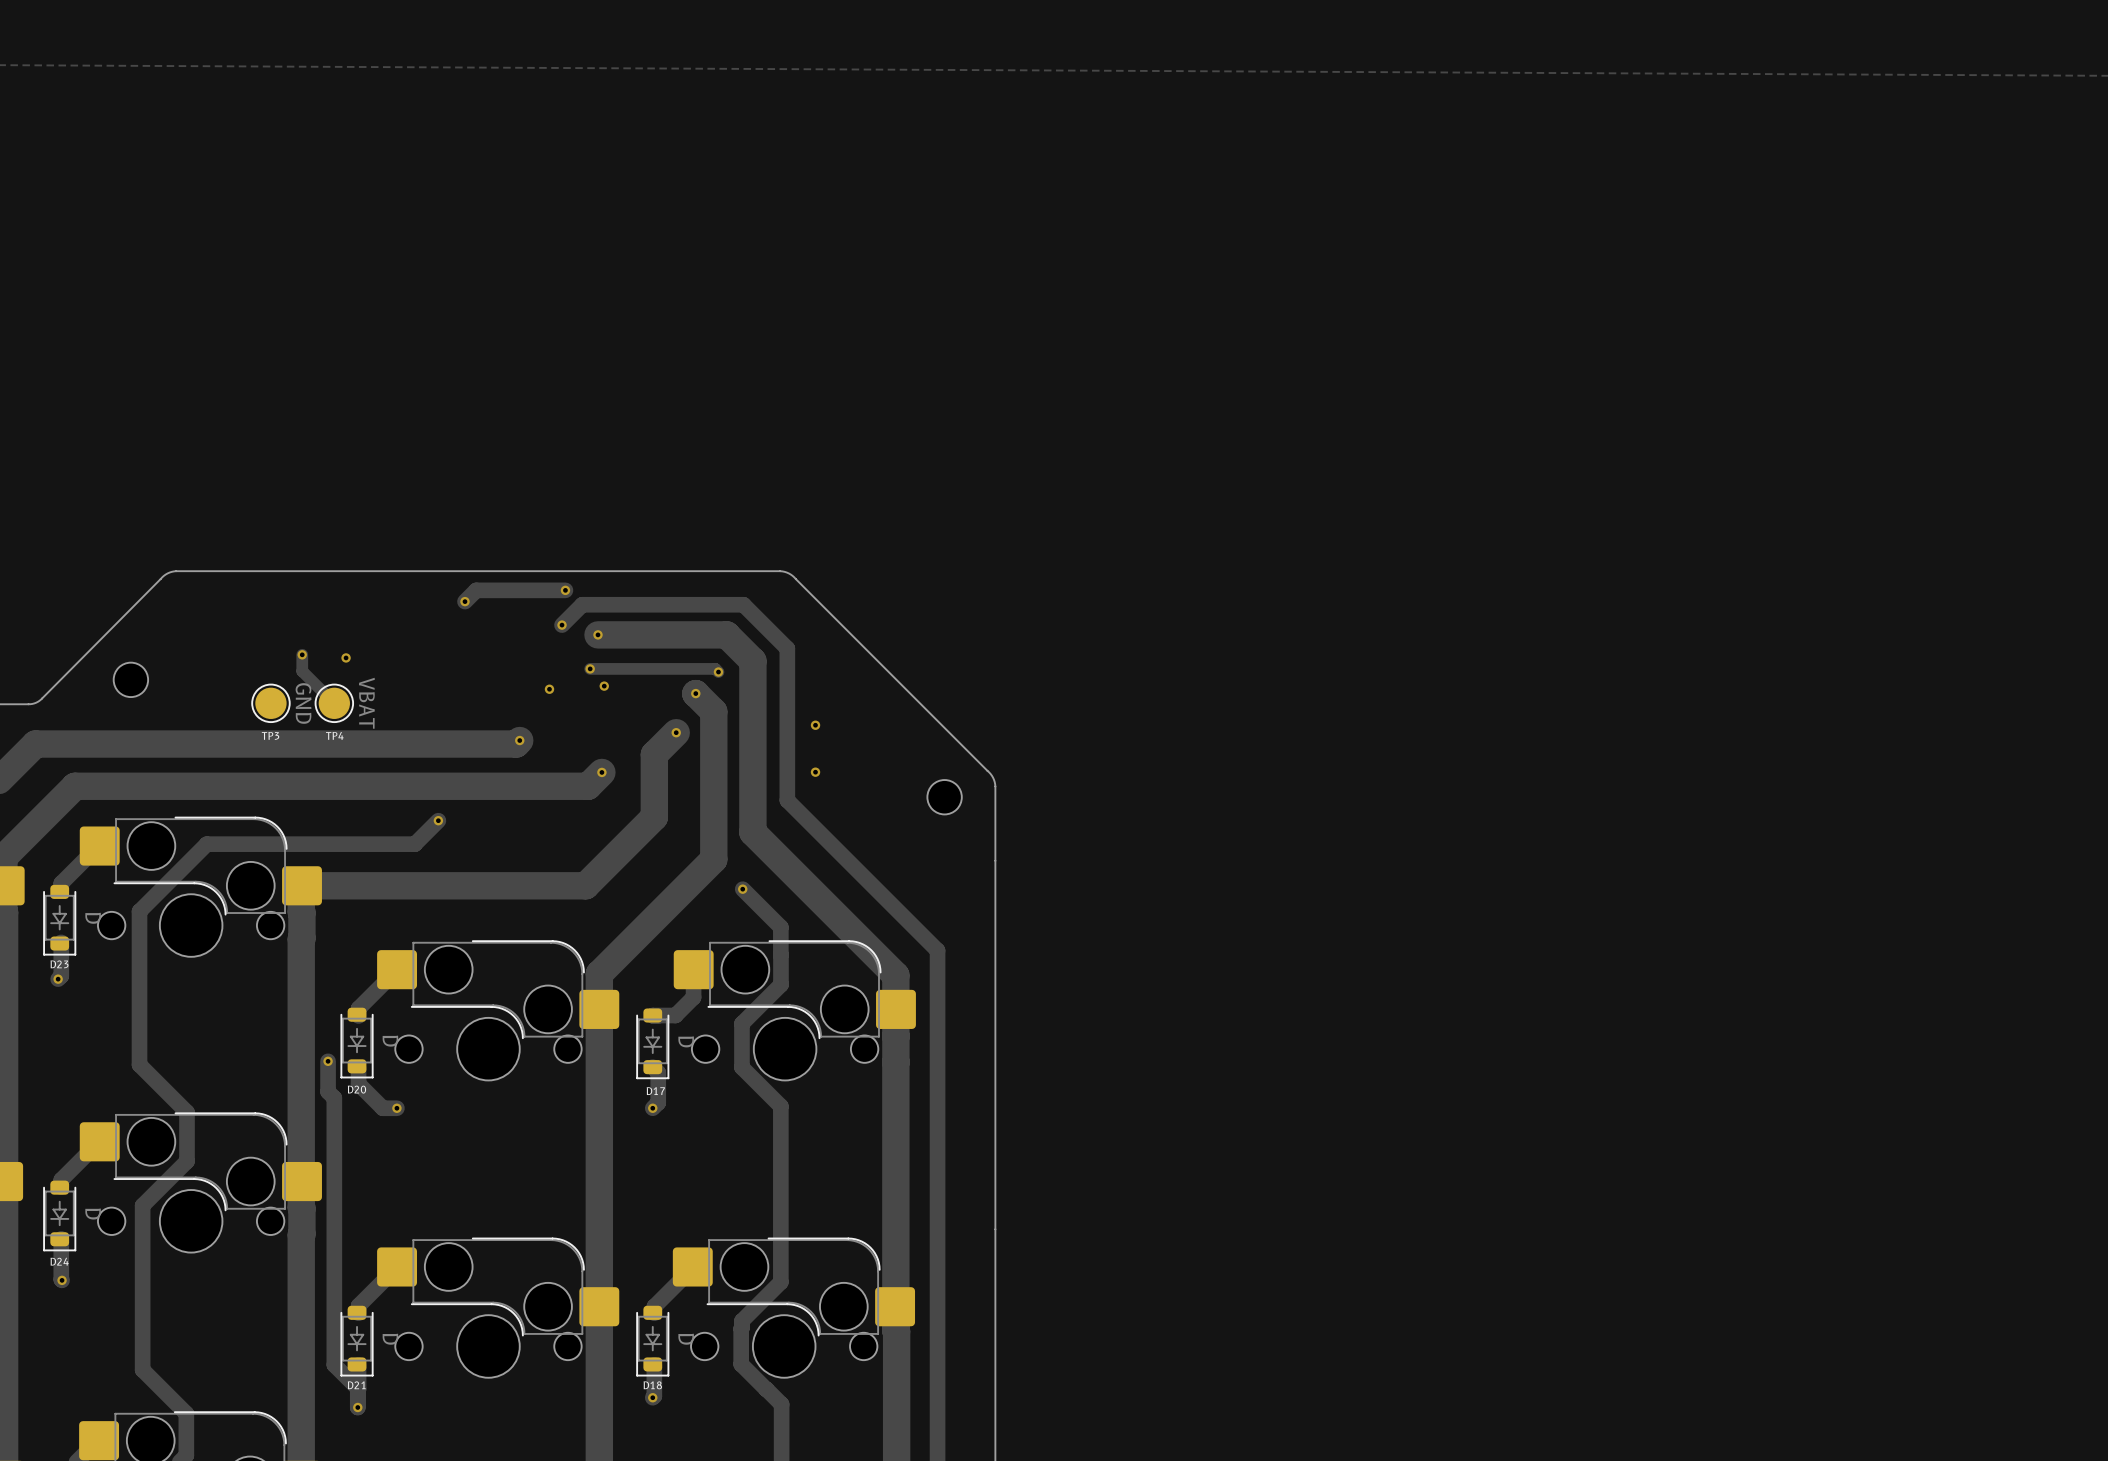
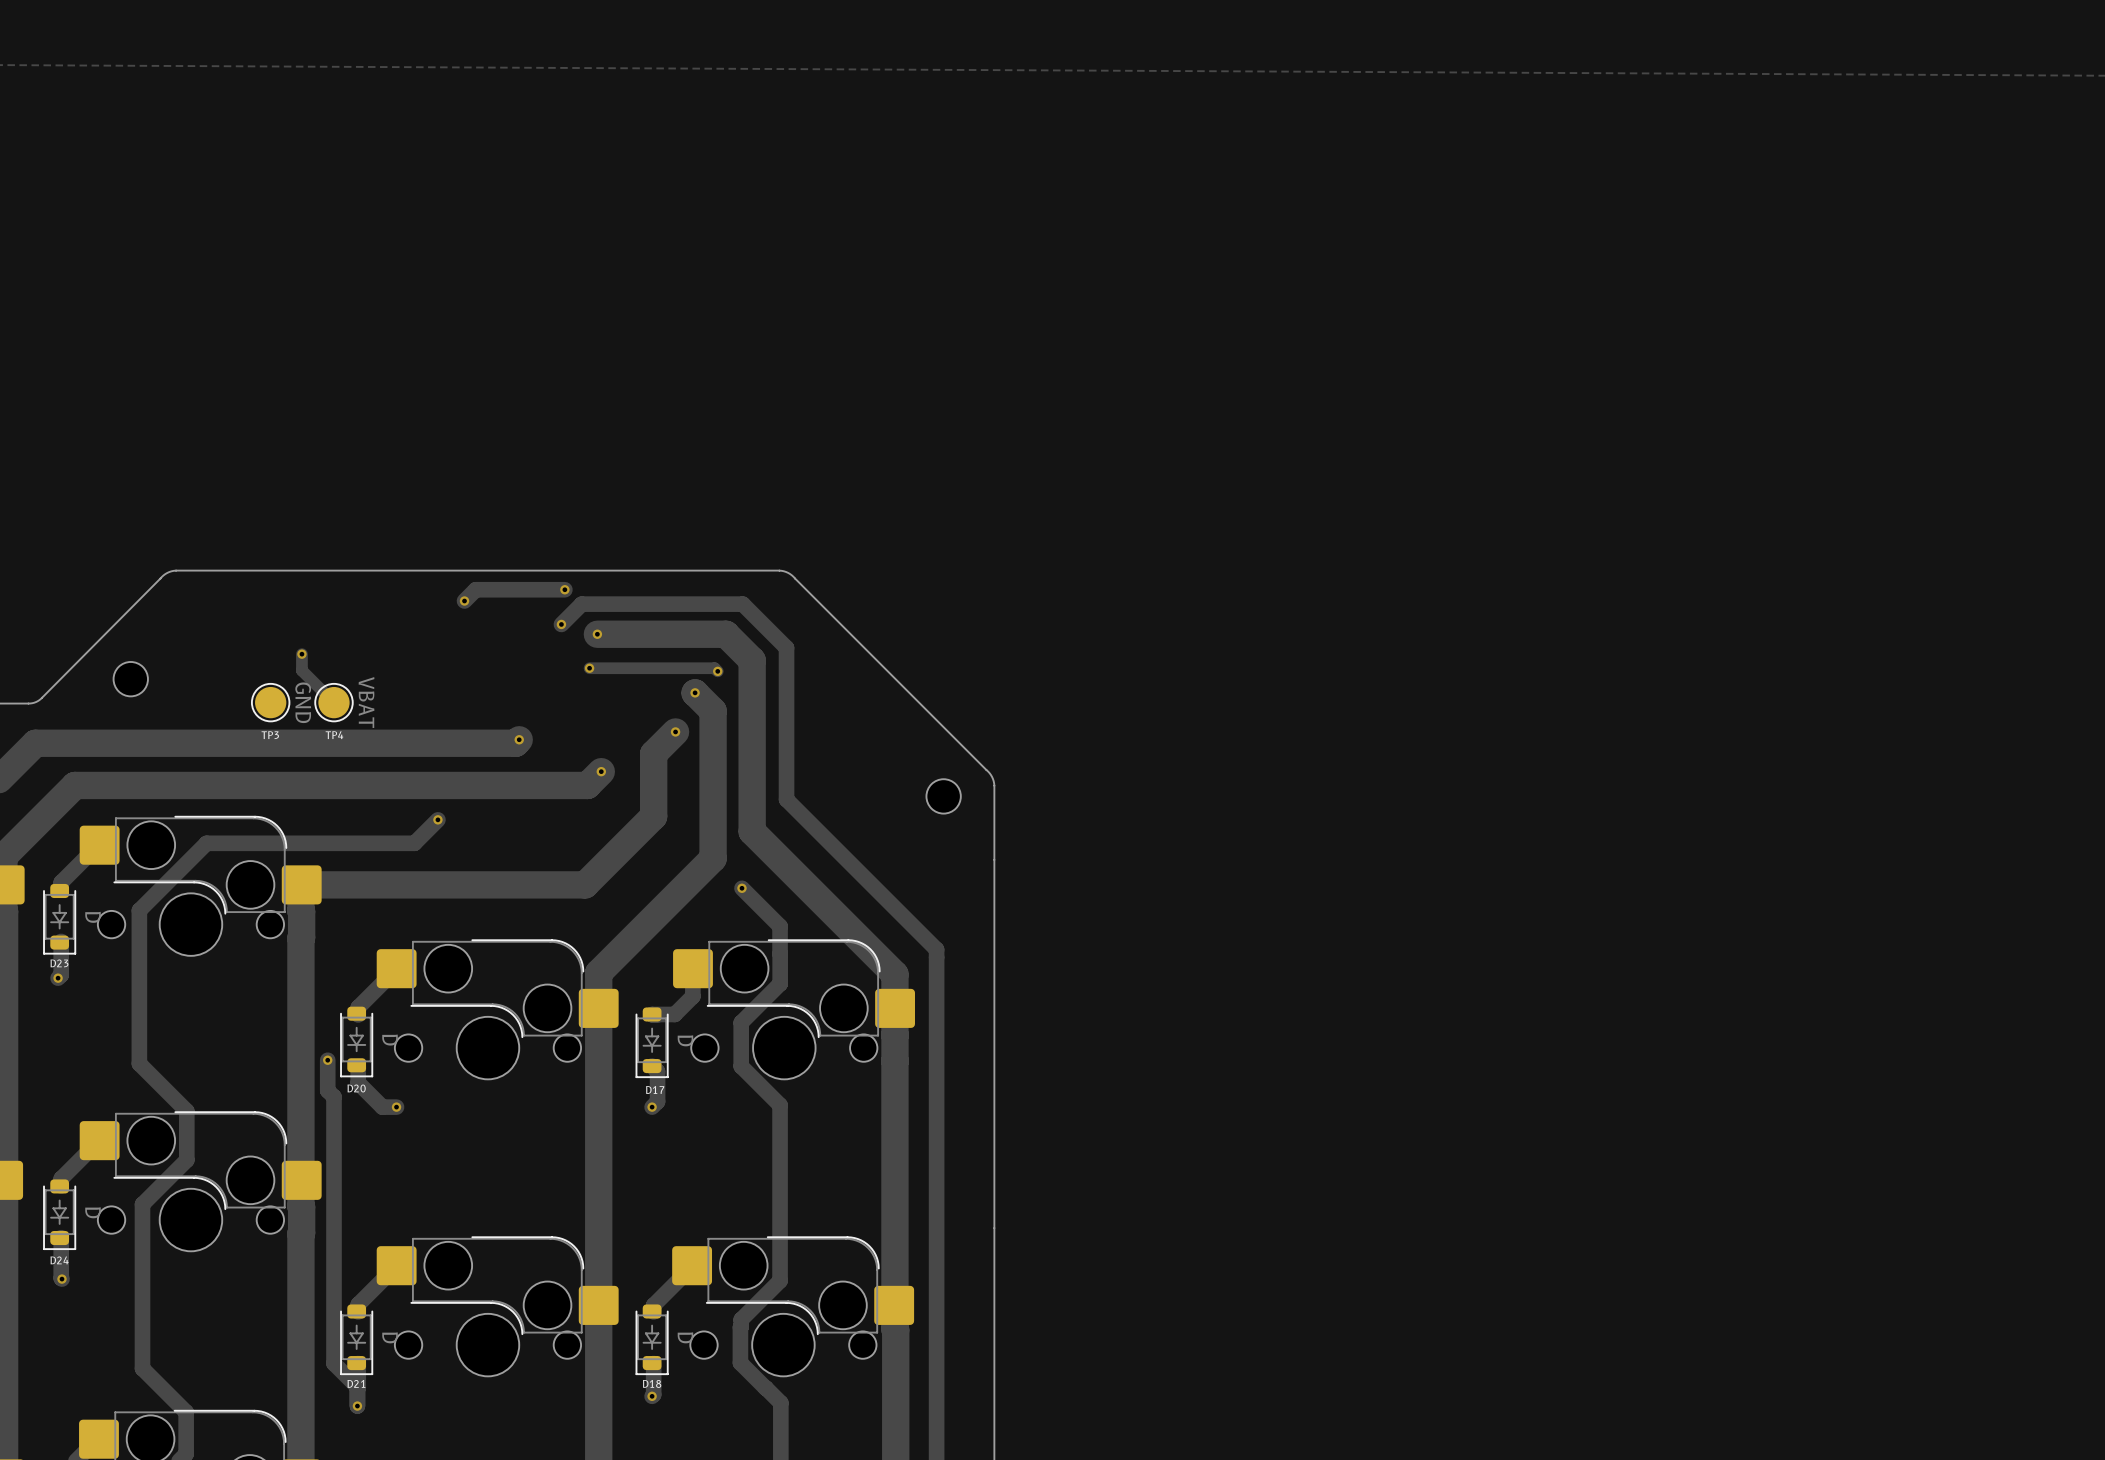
via: (346, 657) -> none
via: (604, 686) -> none
via: (549, 689) -> none
via: (815, 725) -> none
via: (815, 772) -> none

